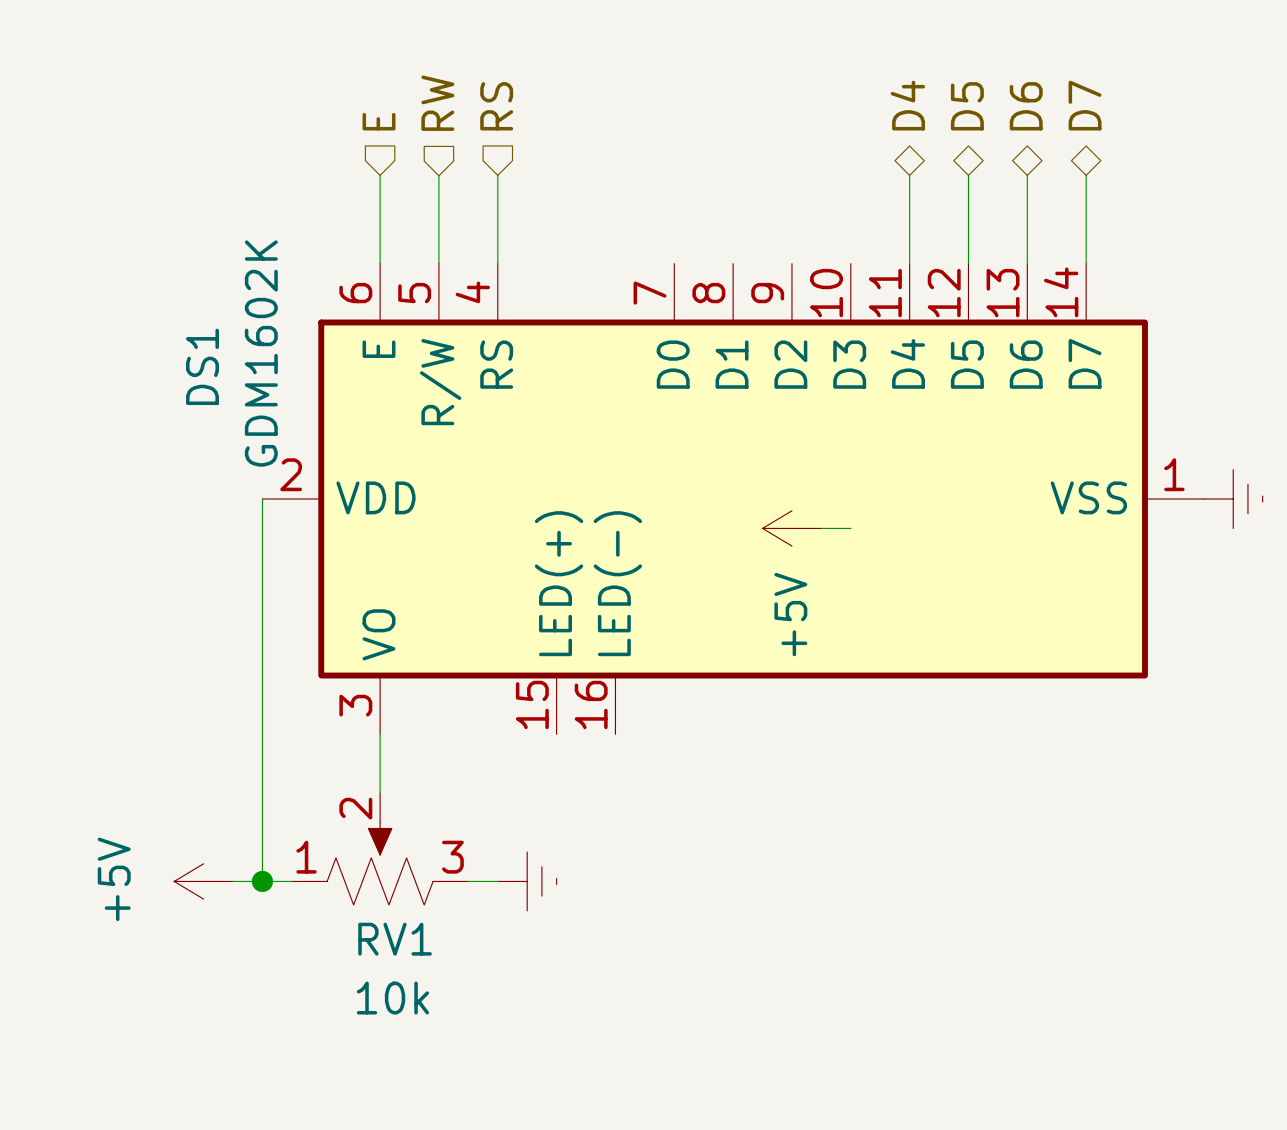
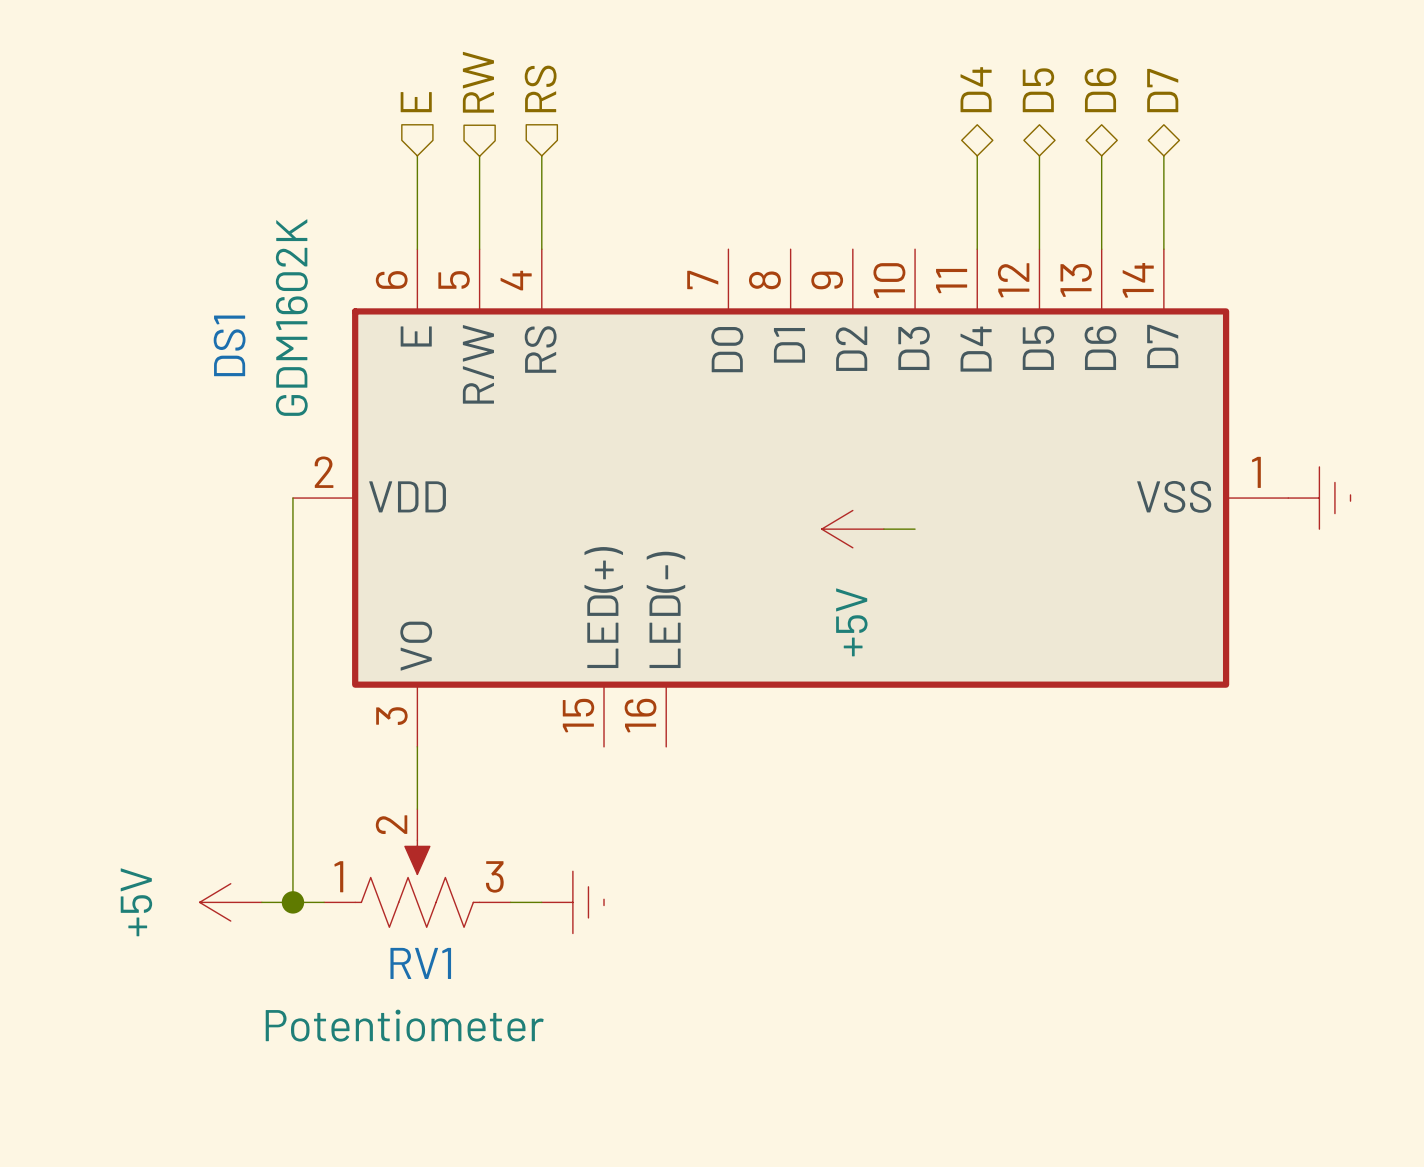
RV1 value: 10k (392, 998) -> Potentiometer (404, 1025)

